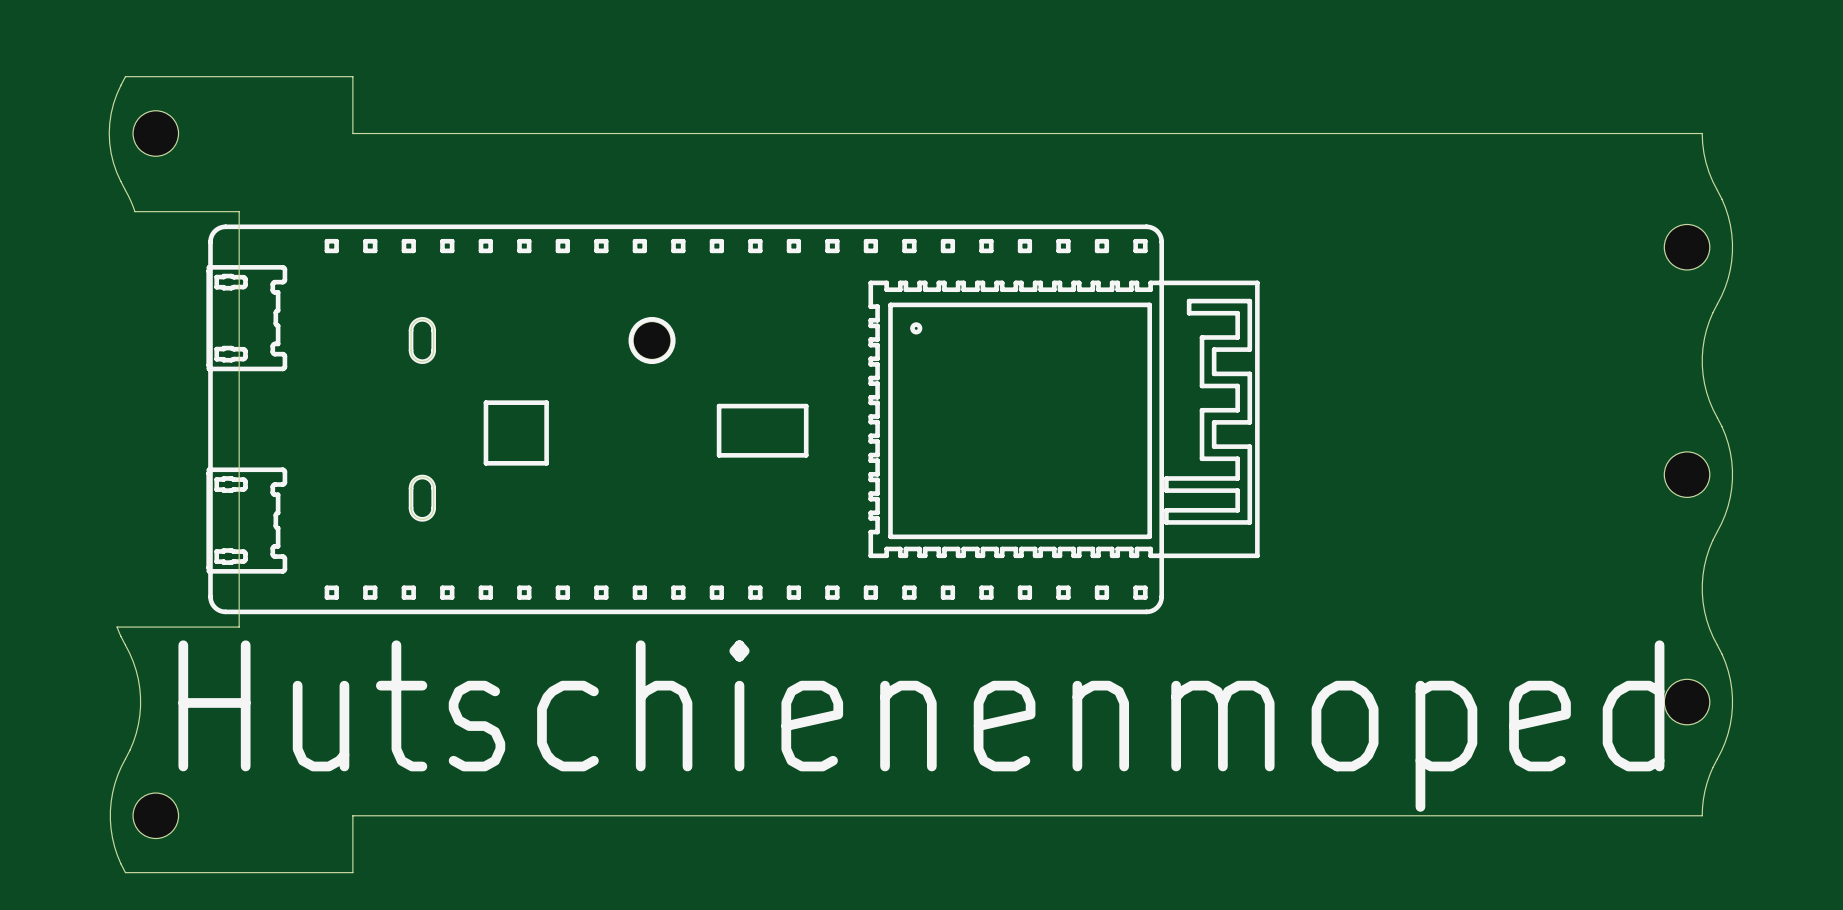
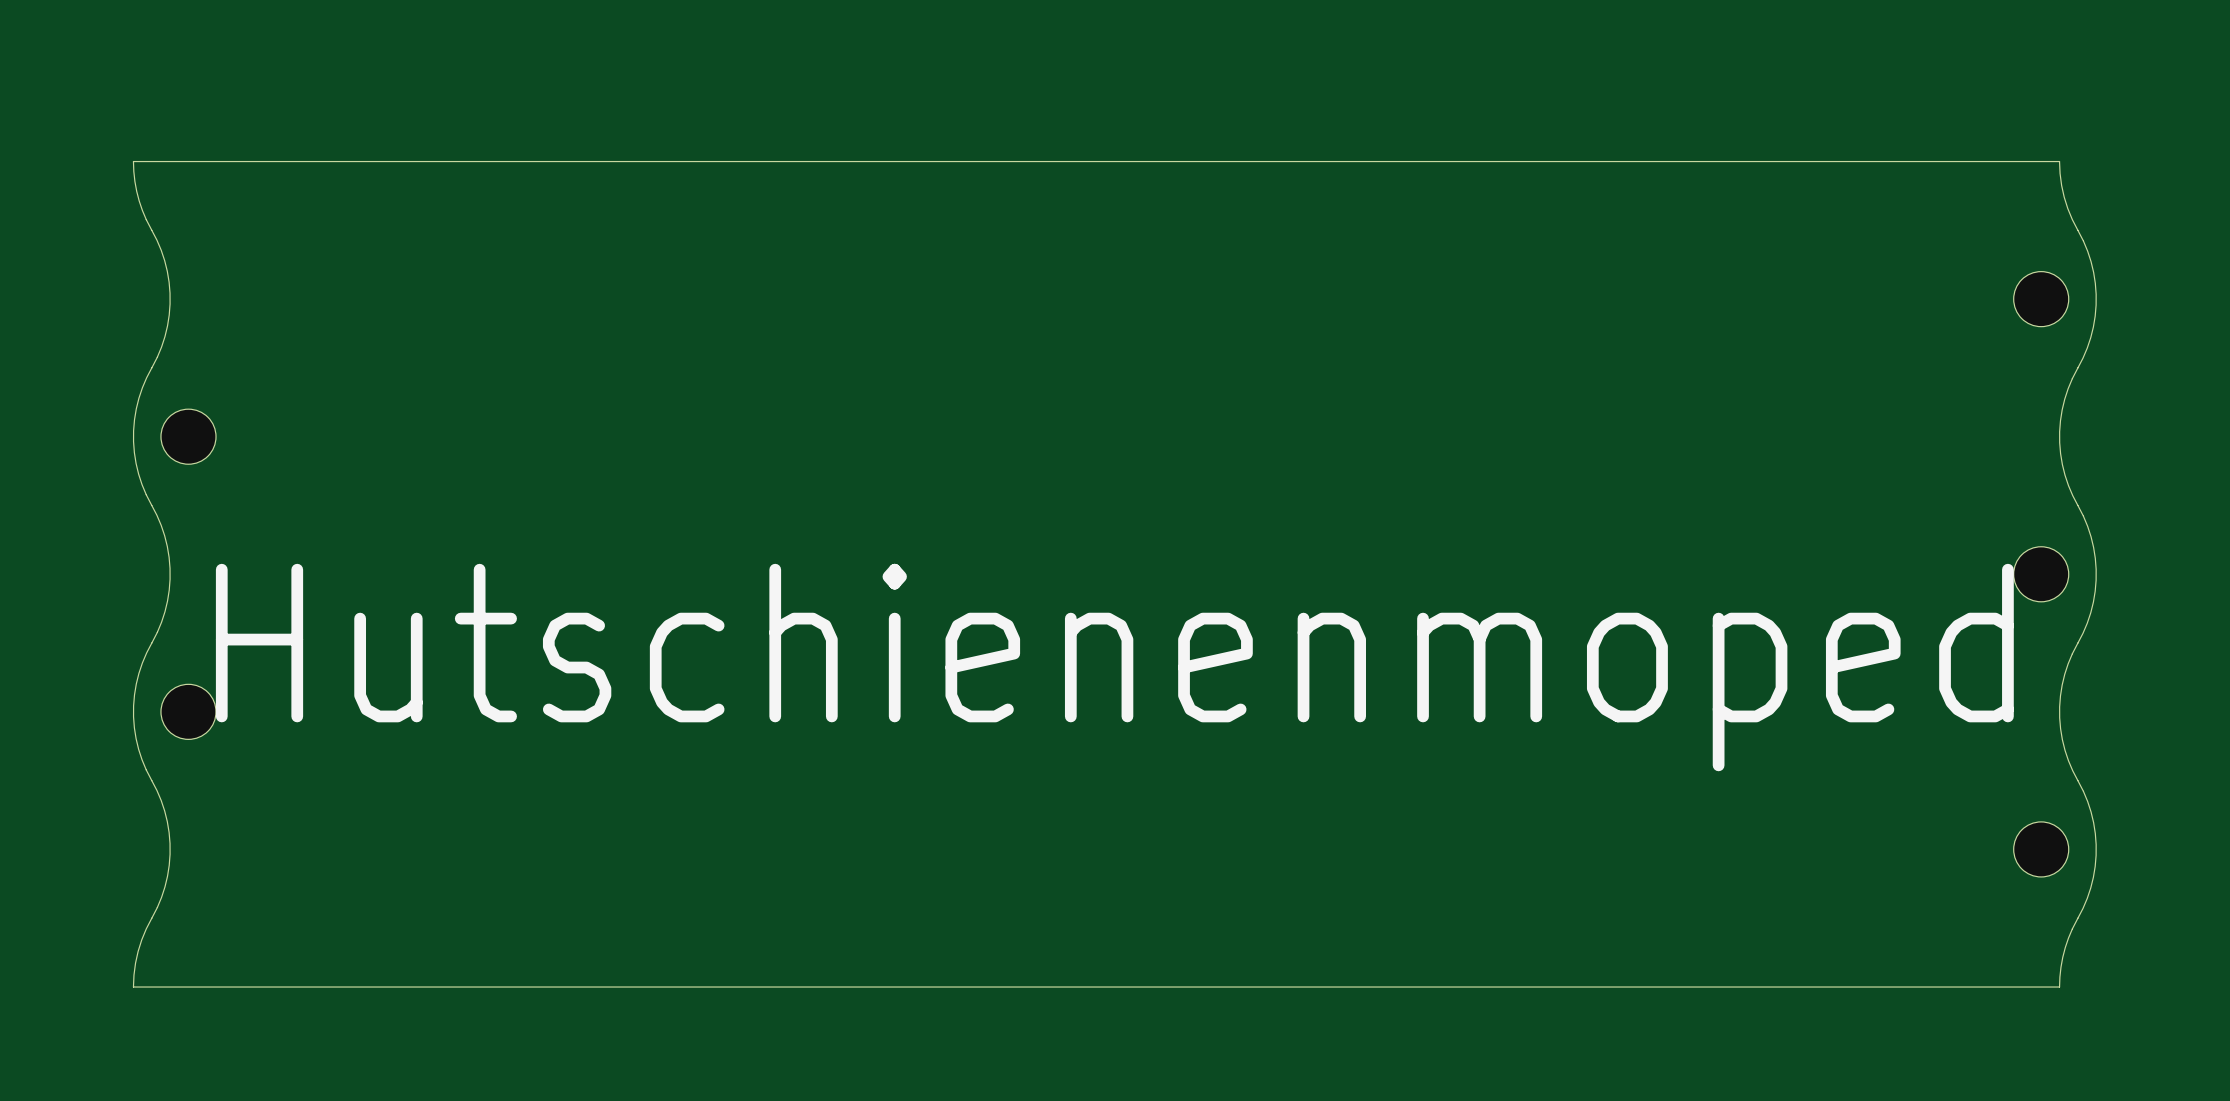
hole: (155, 133) -> none
board edge: (352, 133) (352, 76) (125, 76) (113, 103) (109, 133) (113, 162) (120, 181) -> (426, 161) (133, 161) (136, 191) (146, 219)
board edge: (125, 190) (134, 211) (239, 211) (239, 627) (117, 627) (120, 636) -> (151, 230) (161, 250) (167, 271) (170, 293) (169, 315) (161, 347) (138, 398) (134, 419) (133, 441) (136, 463) (142, 484) (164, 535) (169, 557) (170, 579) (164, 611) (142, 662) (134, 694) (134, 727) (138, 749) (146, 769)
line: (225, 226) (1152, 227) (1158, 232) (1161, 241) (1160, 602) (1154, 609) (1146, 611) (219, 610) (213, 605) (210, 596) (210, 241) (214, 231) (225, 226) -> none
line: (326, 241) (336, 241) (336, 250) (326, 250) (326, 241) -> none
line: (365, 241) (375, 241) (375, 250) (365, 250) (365, 241) -> none
line: (403, 241) (413, 241) (413, 250) (403, 250) (403, 241) -> none
line: (442, 241) (452, 241) (452, 250) (442, 250) (442, 241) -> none
line: (480, 241) (490, 241) (490, 250) (480, 250) (480, 241) -> none
line: (519, 241) (529, 241) (529, 250) (519, 250) (519, 241) -> none
line: (558, 241) (567, 241) (567, 250) (558, 250) (558, 241) -> none
line: (596, 241) (606, 241) (606, 250) (596, 250) (596, 241) -> none
line: (635, 241) (644, 241) (644, 250) (635, 250) (635, 241) -> none
line: (673, 241) (683, 241) (683, 250) (673, 250) (673, 241) -> none
line: (712, 241) (721, 241) (721, 250) (712, 250) (712, 241) -> none
line: (750, 241) (760, 241) (760, 250) (750, 250) (750, 241) -> none
line: (789, 241) (798, 241) (798, 250) (789, 250) (789, 241) -> none
line: (827, 241) (837, 241) (837, 250) (827, 250) (827, 241) -> none
line: (866, 241) (875, 241) (875, 250) (866, 250) (866, 241) -> none
line: (904, 241) (914, 241) (914, 250) (904, 250) (904, 241) -> none
line: (943, 241) (952, 241) (952, 250) (943, 250) (943, 241) -> none
line: (981, 241) (991, 241) (991, 250) (981, 250) (981, 241) -> none
line: (1020, 241) (1029, 241) (1029, 250) (1020, 250) (1020, 241) -> none
line: (1058, 241) (1068, 241) (1068, 250) (1058, 250) (1058, 241) -> none
line: (1097, 241) (1106, 241) (1106, 250) (1097, 250) (1097, 241) -> none
line: (1135, 241) (1145, 241) (1145, 250) (1135, 250) (1135, 241) -> none
line: (208, 267) (284, 268) (284, 281) (274, 282) (272, 284) (273, 291) (278, 292) (278, 310) (275, 312) (278, 343) (273, 345) (272, 352) (284, 355) (284, 368) (208, 368) (208, 267) -> none
line: (223, 276) (216, 277) (216, 287) (231, 288) (245, 285) (244, 277) (223, 276) -> none
line: (870, 282) (886, 282) (886, 289) (900, 289) (900, 282) (905, 282) (905, 289) (919, 289) (919, 282) (925, 282) (925, 289) (938, 289) (938, 282) (944, 282) (944, 289) (958, 289) (958, 282) (963, 282) (963, 289) (977, 289) (977, 282) (982, 282) (982, 289) (996, 289) (996, 282) (1002, 282) (1002, 289) (1015, 289) (1015, 282) (1021, 282) (1021, 289) (1035, 289) (1035, 282) (1040, 282) (1040, 289) (1054, 289) (1054, 282) (1059, 282) (1059, 289) (1073, 289) (1073, 282) (1079, 282) (1079, 289) (1092, 289) (1092, 282) (1098, 282) (1098, 289) (1112, 289) (1112, 282) (1117, 282) (1117, 289) (1131, 289) (1131, 282) (1136, 282) (1136, 289) (1150, 289) (1150, 282) (1257, 282) (1257, 555) (1150, 555) (1150, 548) (1136, 548) (1136, 555) (1131, 555) (1131, 548) (1117, 548) (1117, 555) (1112, 555) (1112, 548) (1098, 548) (1098, 555) (1092, 555) (1092, 548) (1079, 548) (1079, 555) (1073, 555) (1073, 548) (1059, 548) (1059, 555) (1054, 555) (1054, 548) (1040, 548) (1040, 555) (1035, 555) (1035, 548) (1021, 548) (1021, 555) (1015, 555) (1015, 548) (1002, 548) (1002, 555) (996, 555) (996, 548) (982, 548) (982, 555) (977, 555) (977, 548) (963, 548) (963, 555) (958, 555) (958, 548) (944, 548) (944, 555) (938, 555) (938, 548) (925, 548) (925, 555) (919, 555) (919, 548) (905, 548) (905, 555) (900, 555) (900, 548) (886, 548) (886, 555) (870, 555) (870, 532) (877, 532) (877, 518) (870, 518) (870, 512) (877, 512) (877, 499) (870, 499) (870, 493) (877, 493) (877, 479) (870, 479) (870, 474) (877, 474) (877, 460) (870, 460) (870, 455) (877, 455) (877, 441) (870, 441) (870, 435) (877, 435) (877, 422) (870, 422) (870, 416) (877, 416) (877, 402) (870, 402) (870, 397) (877, 397) (877, 383) (870, 383) (870, 378) (877, 378) (877, 364) (870, 364) (870, 358) (877, 358) (877, 345) (870, 345) (870, 339) (877, 339) (877, 325) (870, 325) (870, 320) (877, 320) (877, 306) (870, 306) (870, 282) -> none
line: (1189, 301) (1249, 301) (1249, 349) (1214, 349) (1214, 373) (1249, 373) (1249, 422) (1214, 422) (1214, 446) (1249, 446) (1249, 522) (1166, 522) (1166, 510) (1237, 510) (1237, 490) (1166, 490) (1166, 478) (1237, 478) (1237, 458) (1202, 458) (1202, 410) (1237, 410) (1237, 385) (1202, 385) (1202, 337) (1237, 337) (1237, 313) (1189, 313) (1189, 301) -> none
line: (890, 304) (1149, 304) -> none
line: (890, 305) (890, 536) -> none
line: (1149, 305) (1149, 536) -> none
drawing: [628, 316, 676, 365] -> none
drawing: [910, 322, 923, 335] -> none
board edge: (411, 330) (412, 356) (419, 361) (428, 360) (433, 351) (432, 325) (426, 320) (419, 319) (413, 323) (411, 330) -> none
line: (411, 330) (412, 356) (419, 361) (428, 360) (433, 351) (432, 325) (426, 320) (419, 319) (413, 323) (411, 330) -> none
hole: (652, 340) -> none
line: (223, 348) (216, 349) (216, 359) (231, 360) (245, 357) (244, 349) (223, 348) -> none
hole: none -> (188, 436)
line: (485, 402) (546, 402) (546, 463) (485, 463) (485, 402) -> none
line: (719, 406) (806, 406) (806, 455) (719, 455) (719, 406) -> none
line: (208, 469) (208, 571) (284, 570) (284, 557) (272, 554) (273, 547) (278, 546) (278, 528) (275, 525) (278, 494) (273, 493) (272, 486) (274, 484) (284, 483) (284, 470) (208, 469) -> none
line: (223, 478) (216, 479) (216, 489) (231, 490) (245, 488) (244, 479) (223, 478) -> none
board edge: (411, 488) (412, 513) (419, 518) (428, 517) (433, 509) (432, 482) (426, 477) (419, 477) (413, 481) (411, 488) -> none
line: (411, 488) (412, 513) (419, 518) (428, 517) (433, 509) (432, 482) (426, 477) (419, 477) (413, 481) (411, 488) -> none
line: (890, 536) (1149, 536) -> none
line: (223, 550) (216, 551) (216, 561) (231, 562) (245, 560) (244, 551) (223, 550) -> none
line: (326, 587) (326, 597) (336, 597) (336, 587) (326, 587) -> none
line: (365, 587) (365, 597) (375, 597) (375, 587) (365, 587) -> none
line: (403, 587) (403, 597) (413, 597) (413, 587) (403, 587) -> none
line: (442, 587) (442, 597) (452, 597) (452, 587) (442, 587) -> none
line: (480, 587) (480, 597) (490, 597) (490, 587) (480, 587) -> none
line: (519, 587) (519, 597) (529, 597) (529, 587) (519, 587) -> none
line: (558, 587) (558, 597) (567, 597) (567, 587) (558, 587) -> none
line: (596, 587) (596, 597) (606, 597) (606, 587) (596, 587) -> none
line: (635, 587) (635, 597) (644, 597) (644, 587) (635, 587) -> none
line: (673, 587) (673, 597) (683, 597) (683, 587) (673, 587) -> none
line: (712, 587) (712, 597) (721, 597) (721, 587) (712, 587) -> none
line: (750, 587) (750, 597) (760, 597) (760, 587) (750, 587) -> none
line: (789, 587) (789, 597) (798, 597) (798, 587) (789, 587) -> none
line: (827, 587) (827, 597) (837, 597) (837, 587) (827, 587) -> none
line: (866, 587) (866, 597) (875, 597) (875, 587) (866, 587) -> none
line: (904, 587) (904, 597) (914, 597) (914, 587) (904, 587) -> none
line: (943, 587) (943, 597) (952, 597) (952, 587) (943, 587) -> none
line: (981, 587) (981, 597) (991, 597) (991, 587) (981, 587) -> none
line: (1020, 587) (1020, 597) (1029, 597) (1029, 587) (1020, 587) -> none
line: (1058, 587) (1058, 597) (1068, 597) (1068, 587) (1058, 587) -> none
line: (1097, 587) (1097, 597) (1106, 597) (1106, 587) (1097, 587) -> none
line: (1135, 587) (1145, 587) (1145, 597) (1135, 597) (1135, 587) -> none
hole: none -> (188, 711)
text position: Hutschienenmoped (921, 726) -> Hutschienenmoped (1114, 667)
board edge: (125, 758) (112, 792) (110, 819) (114, 846) (125, 872) (352, 872) (352, 815) -> (151, 918) (138, 951) (133, 987) (426, 987)
hole: (155, 815) -> none

